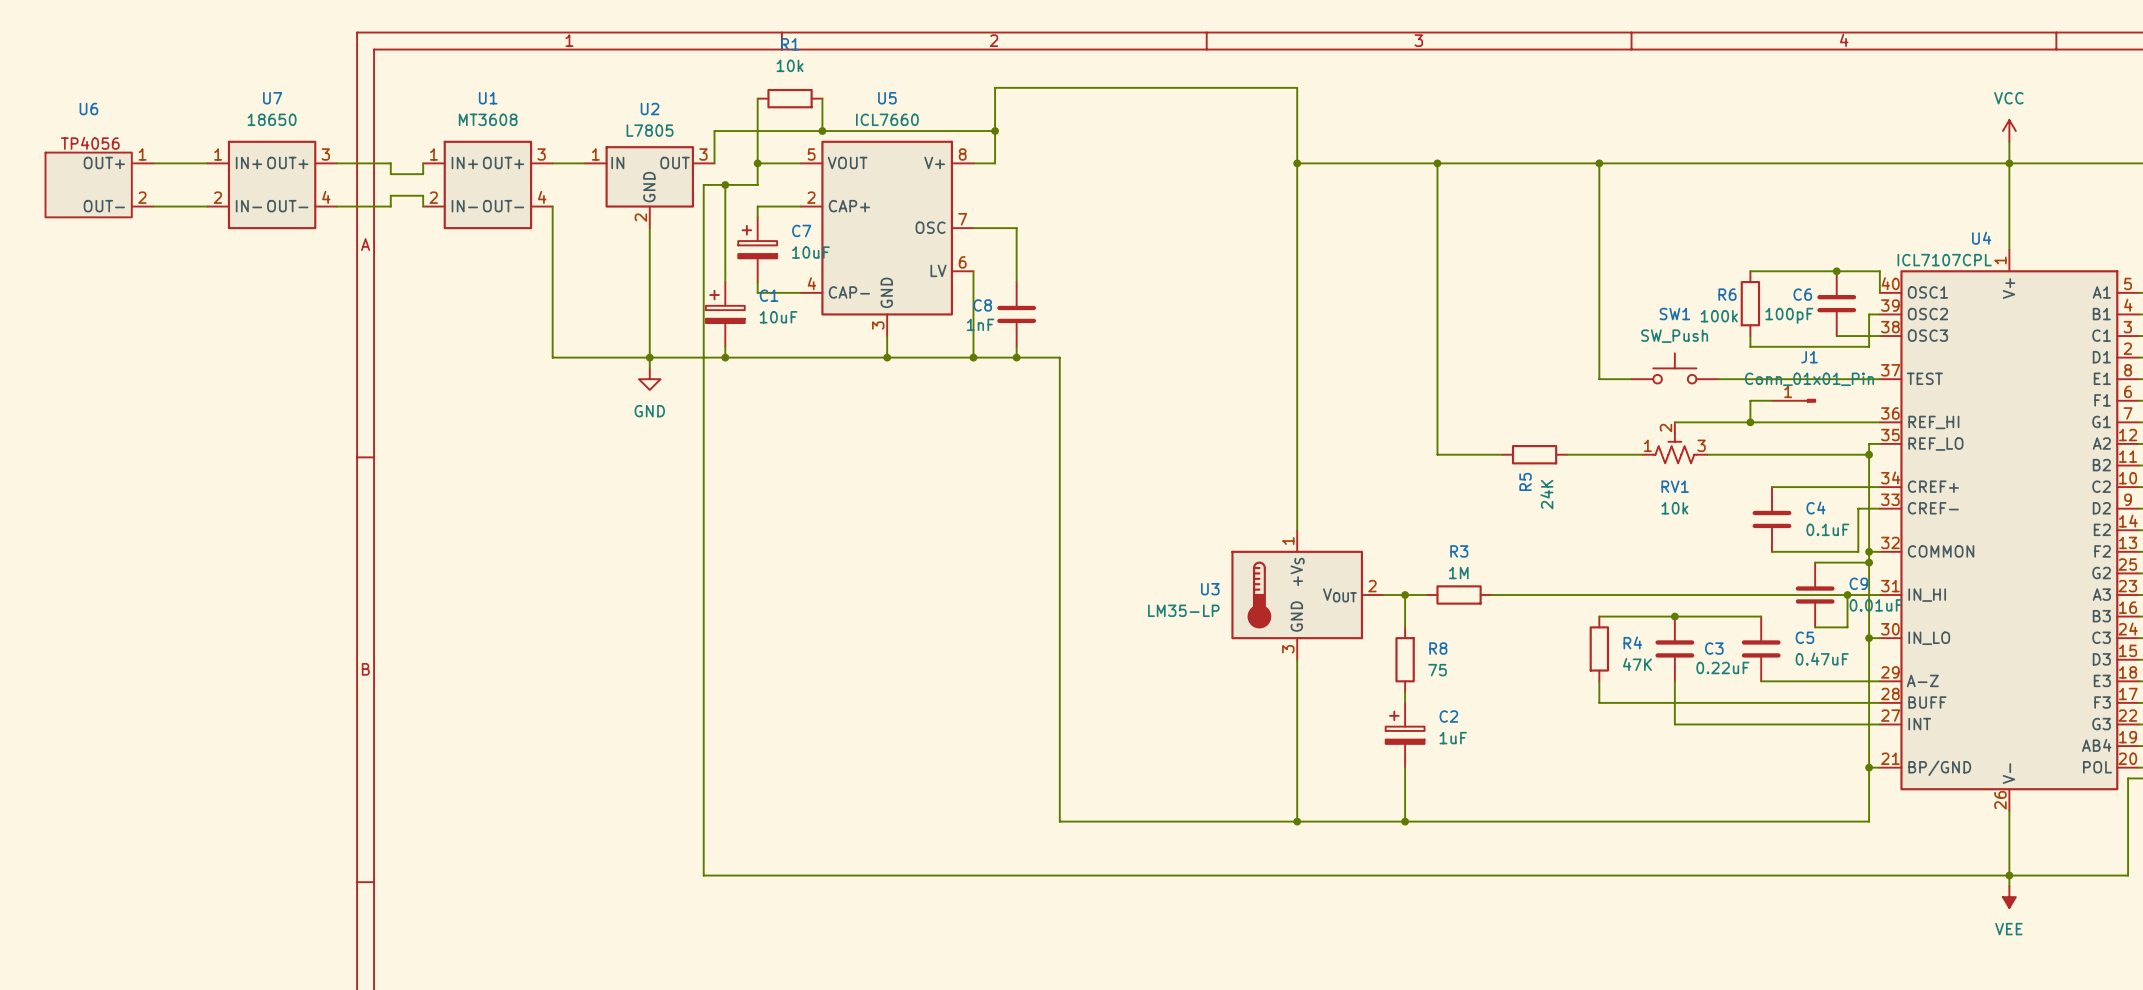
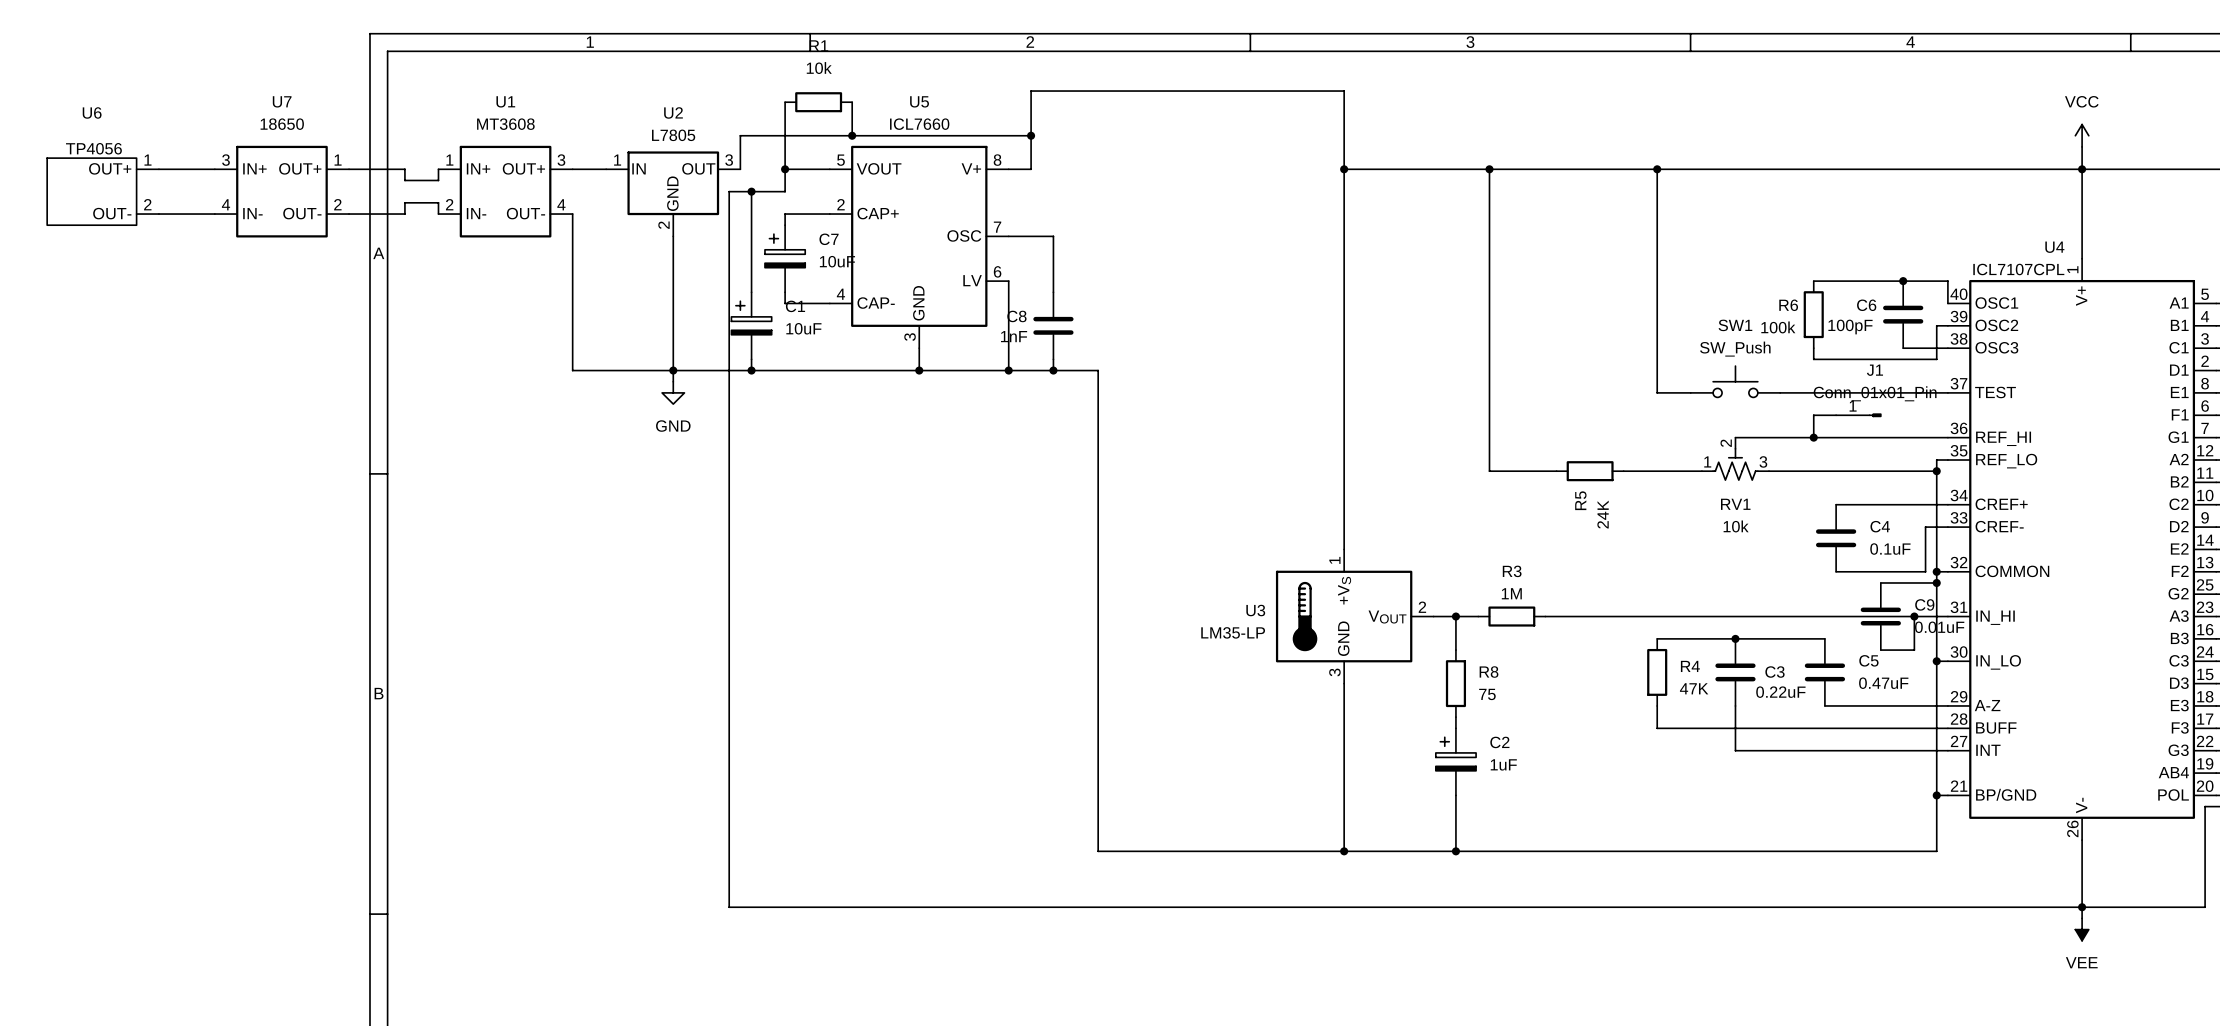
U7 pin number: 1 (218, 154) -> 3 (226, 160)
U7 pin number: 3 (325, 154) -> 1 (338, 160)
U7 pin number: 2 (217, 197) -> 4 (225, 204)
U7 pin number: 4 (326, 197) -> 2 (337, 204)

